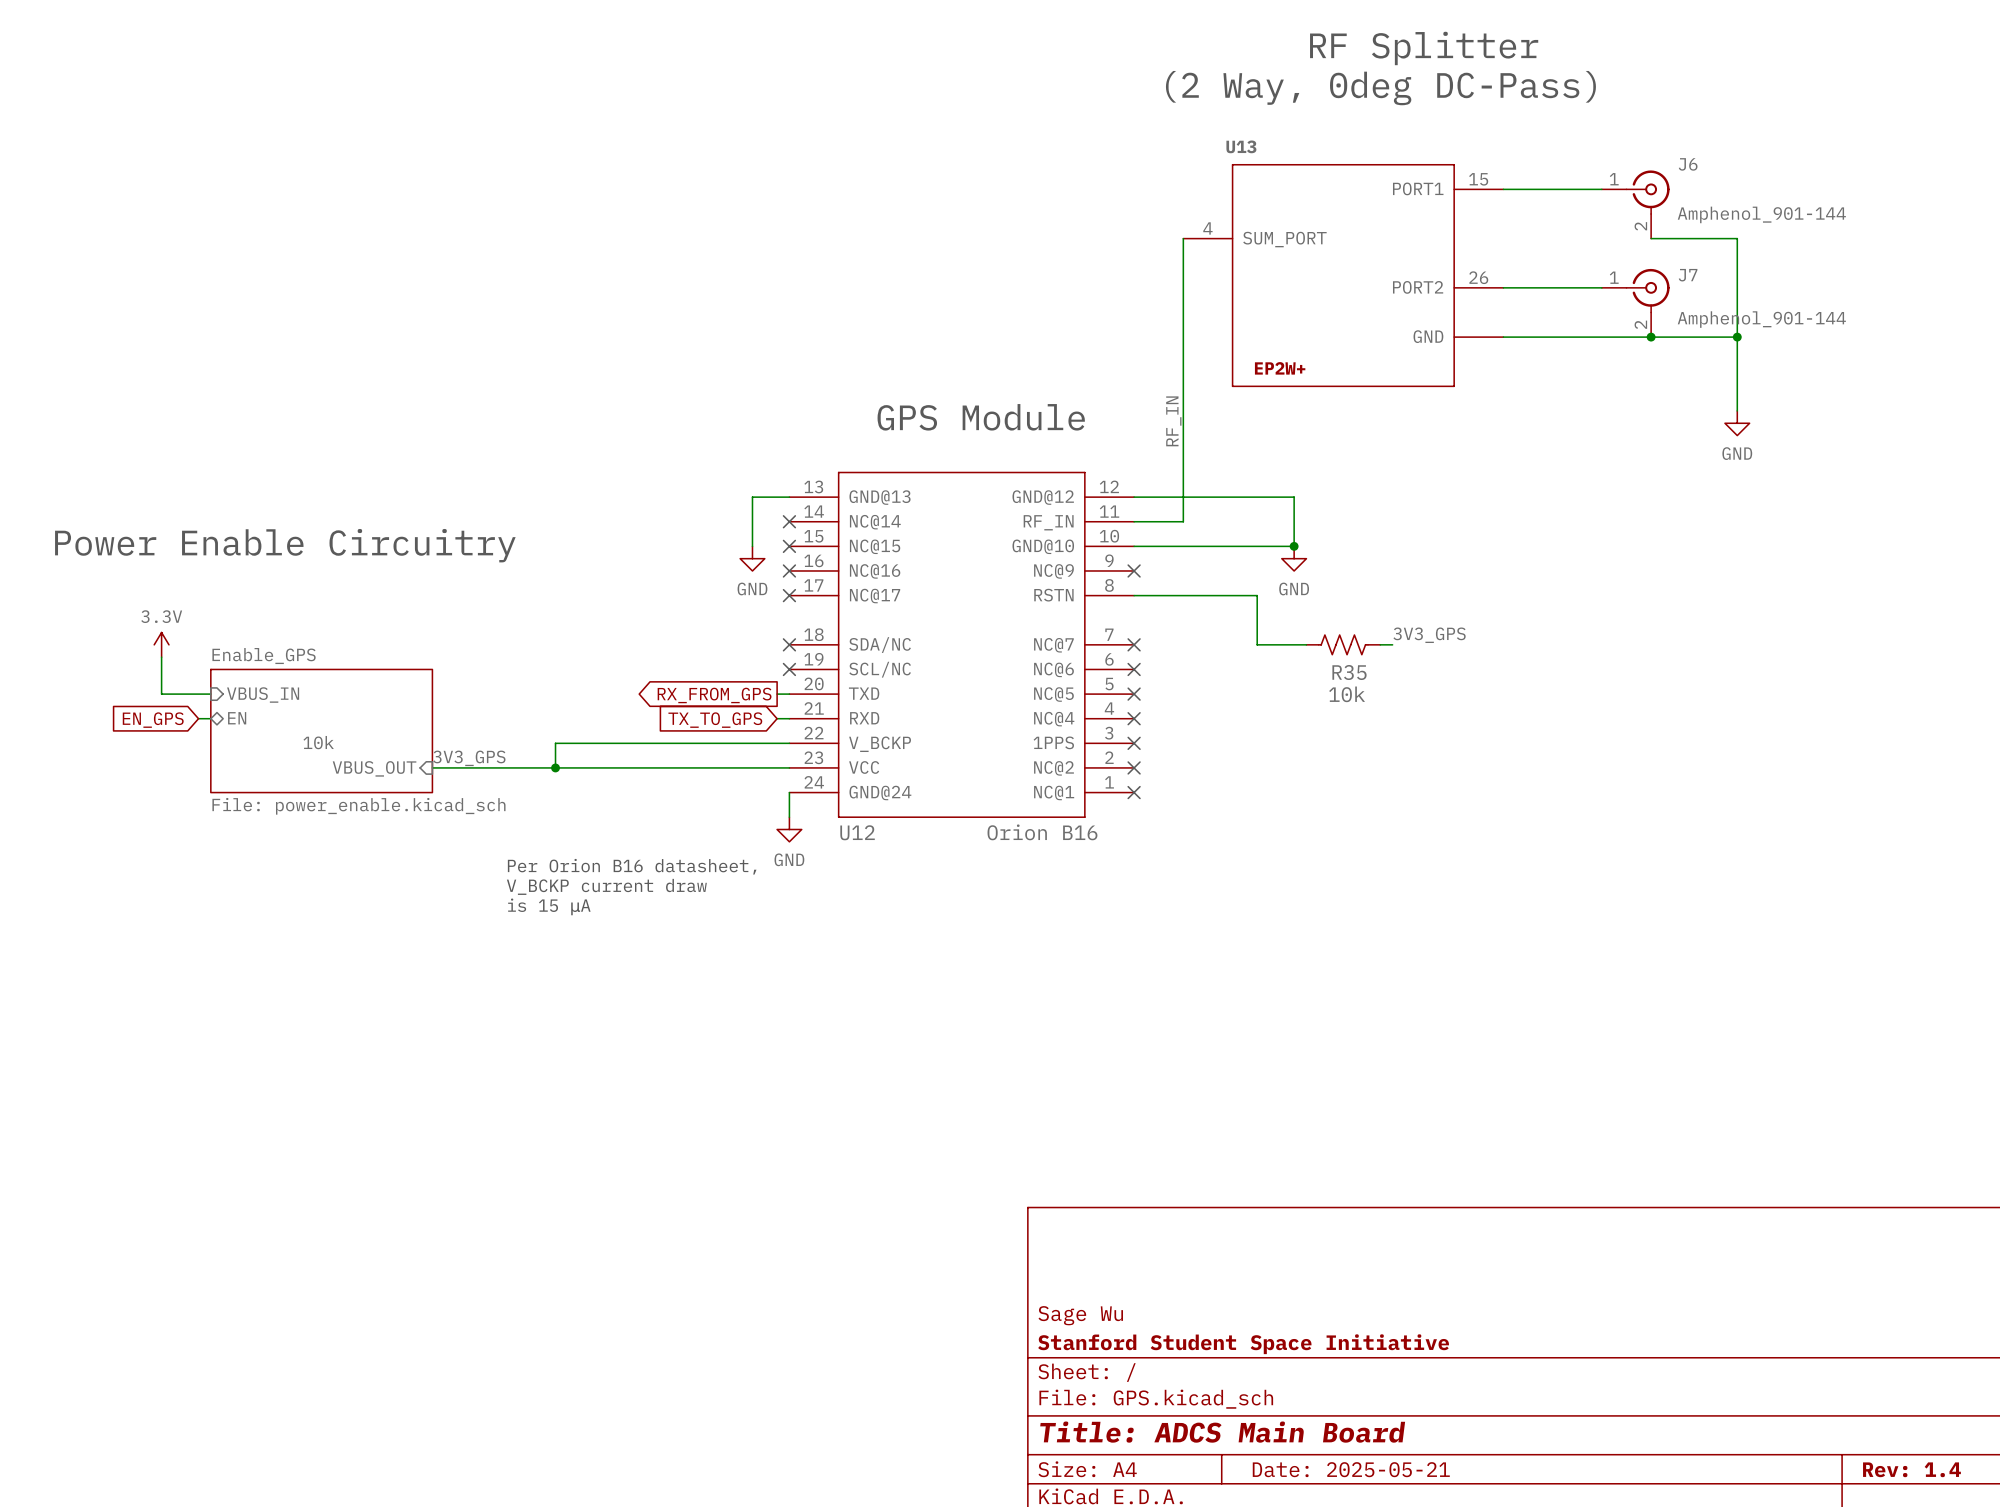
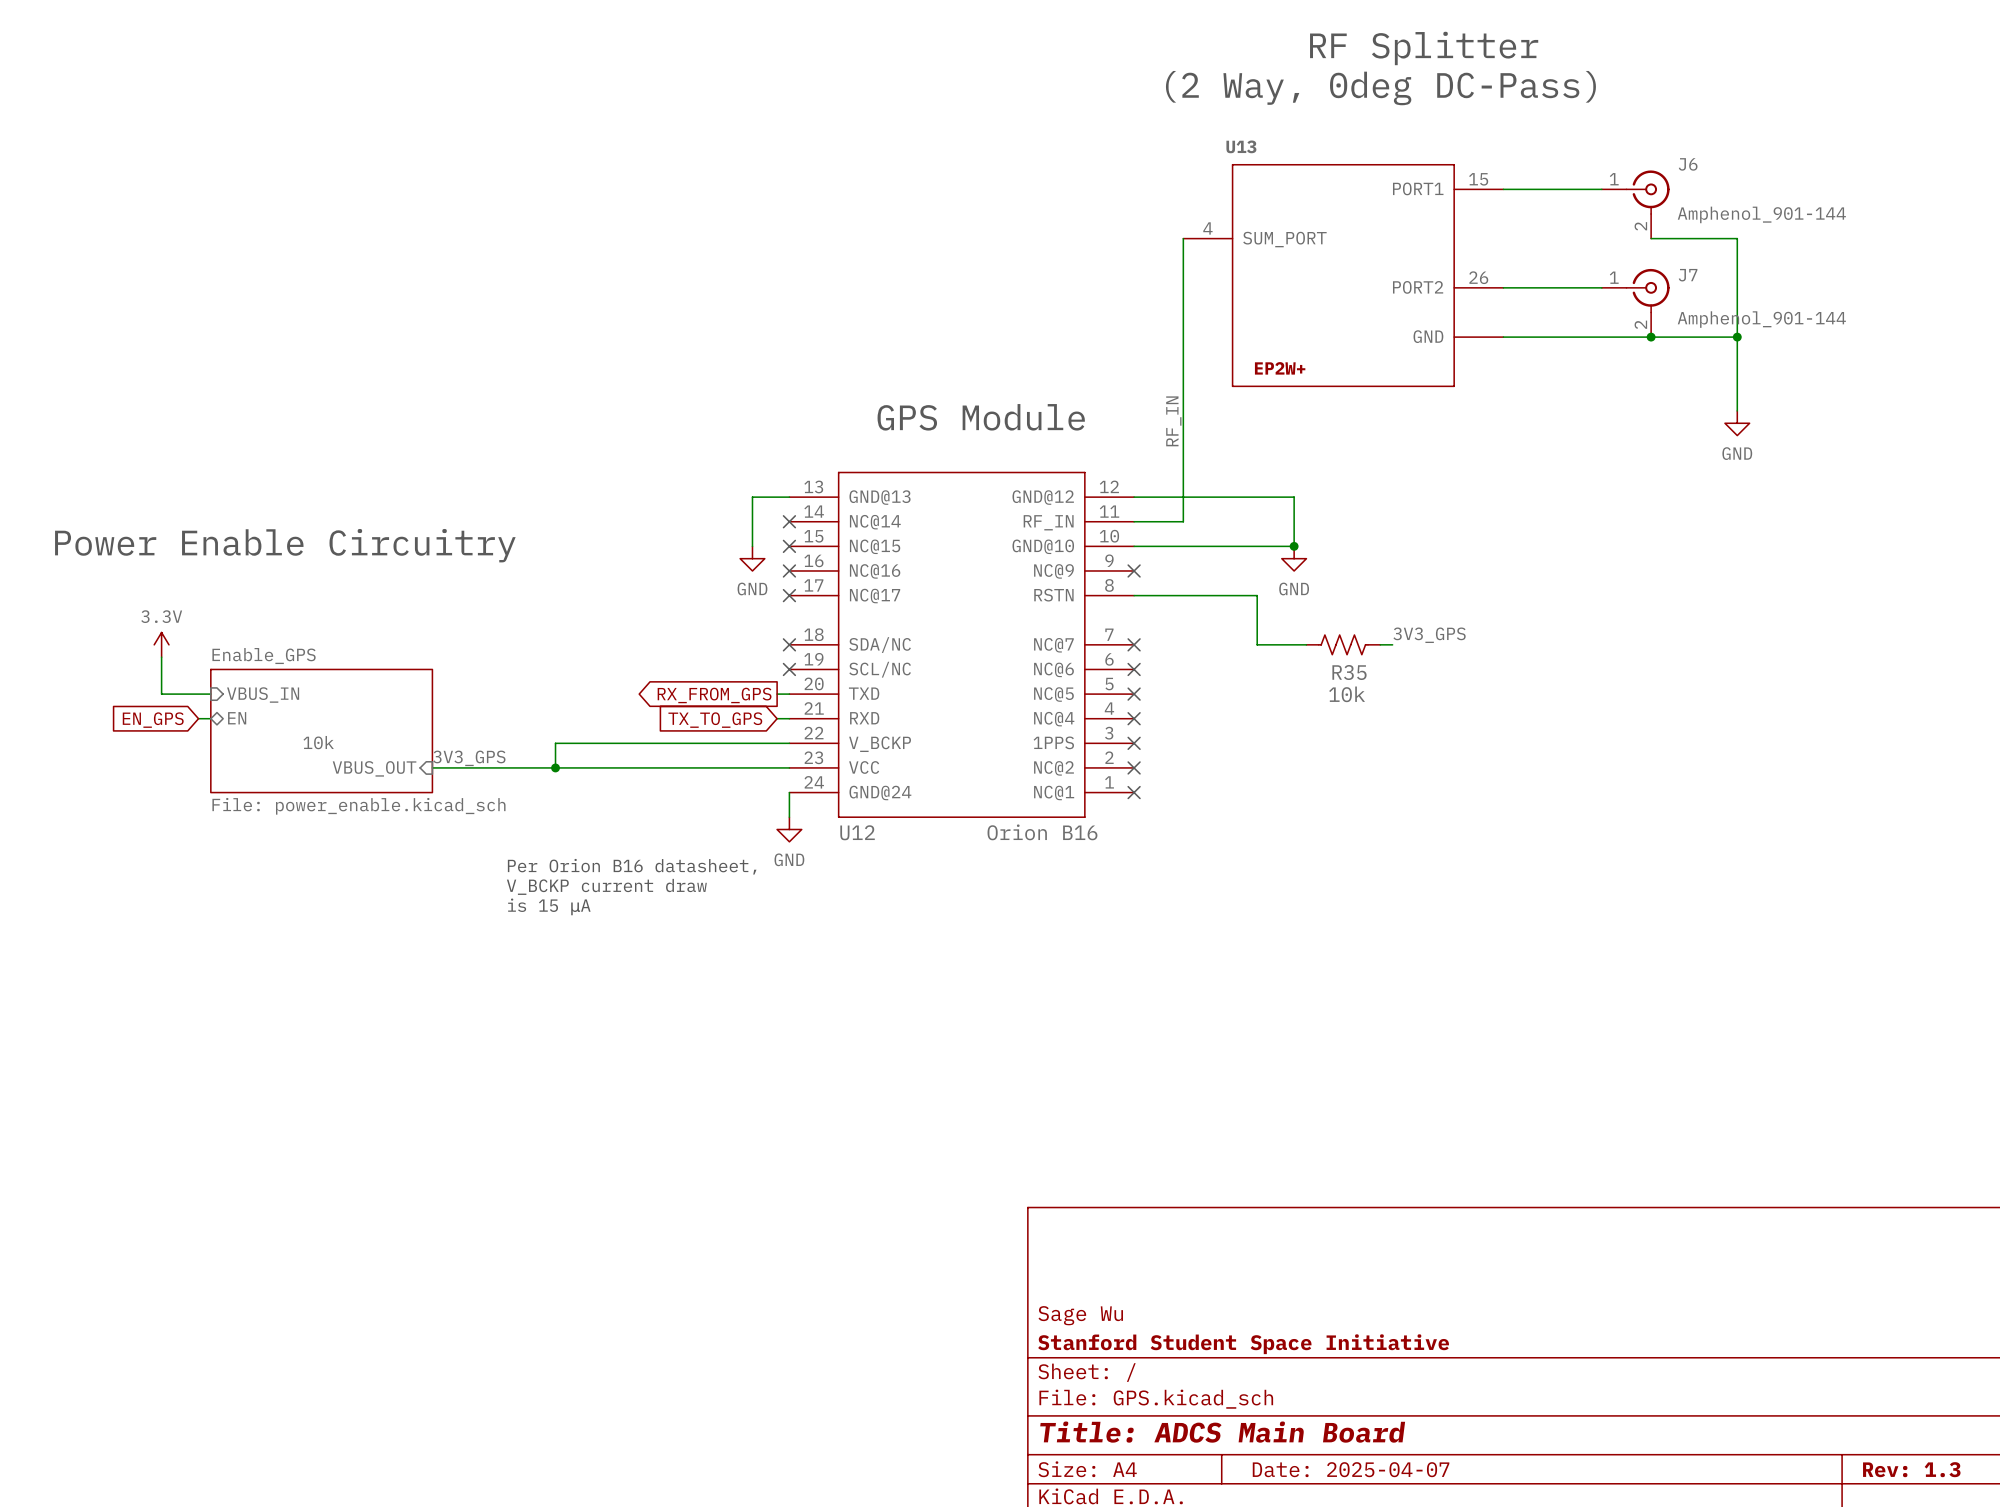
title block: Date: 2025-05-21 (1351, 1469) -> Date: 2025-04-07 (1351, 1469)
title block: Rev: 1.4 (1911, 1469) -> Rev: 1.3 (1911, 1469)

